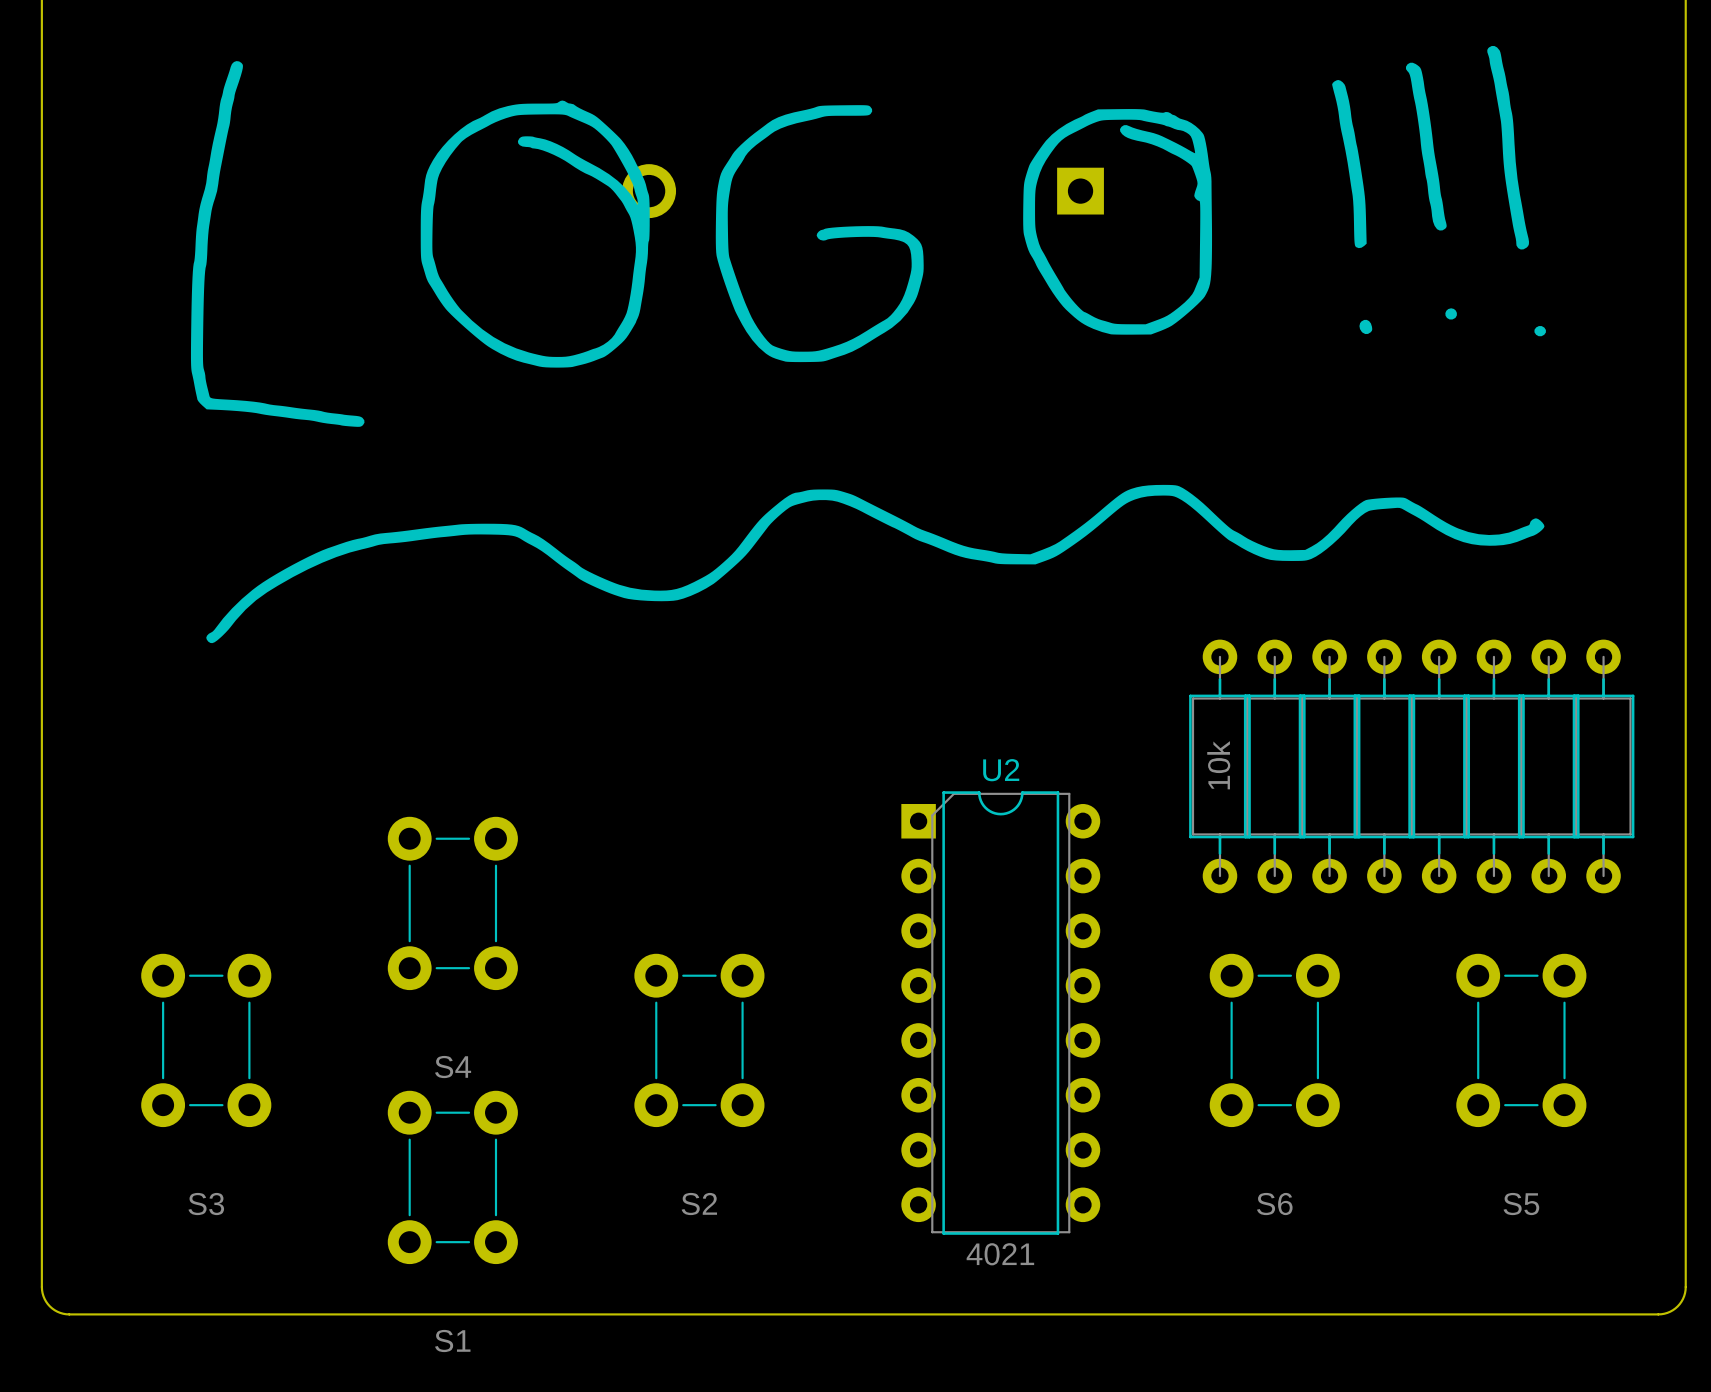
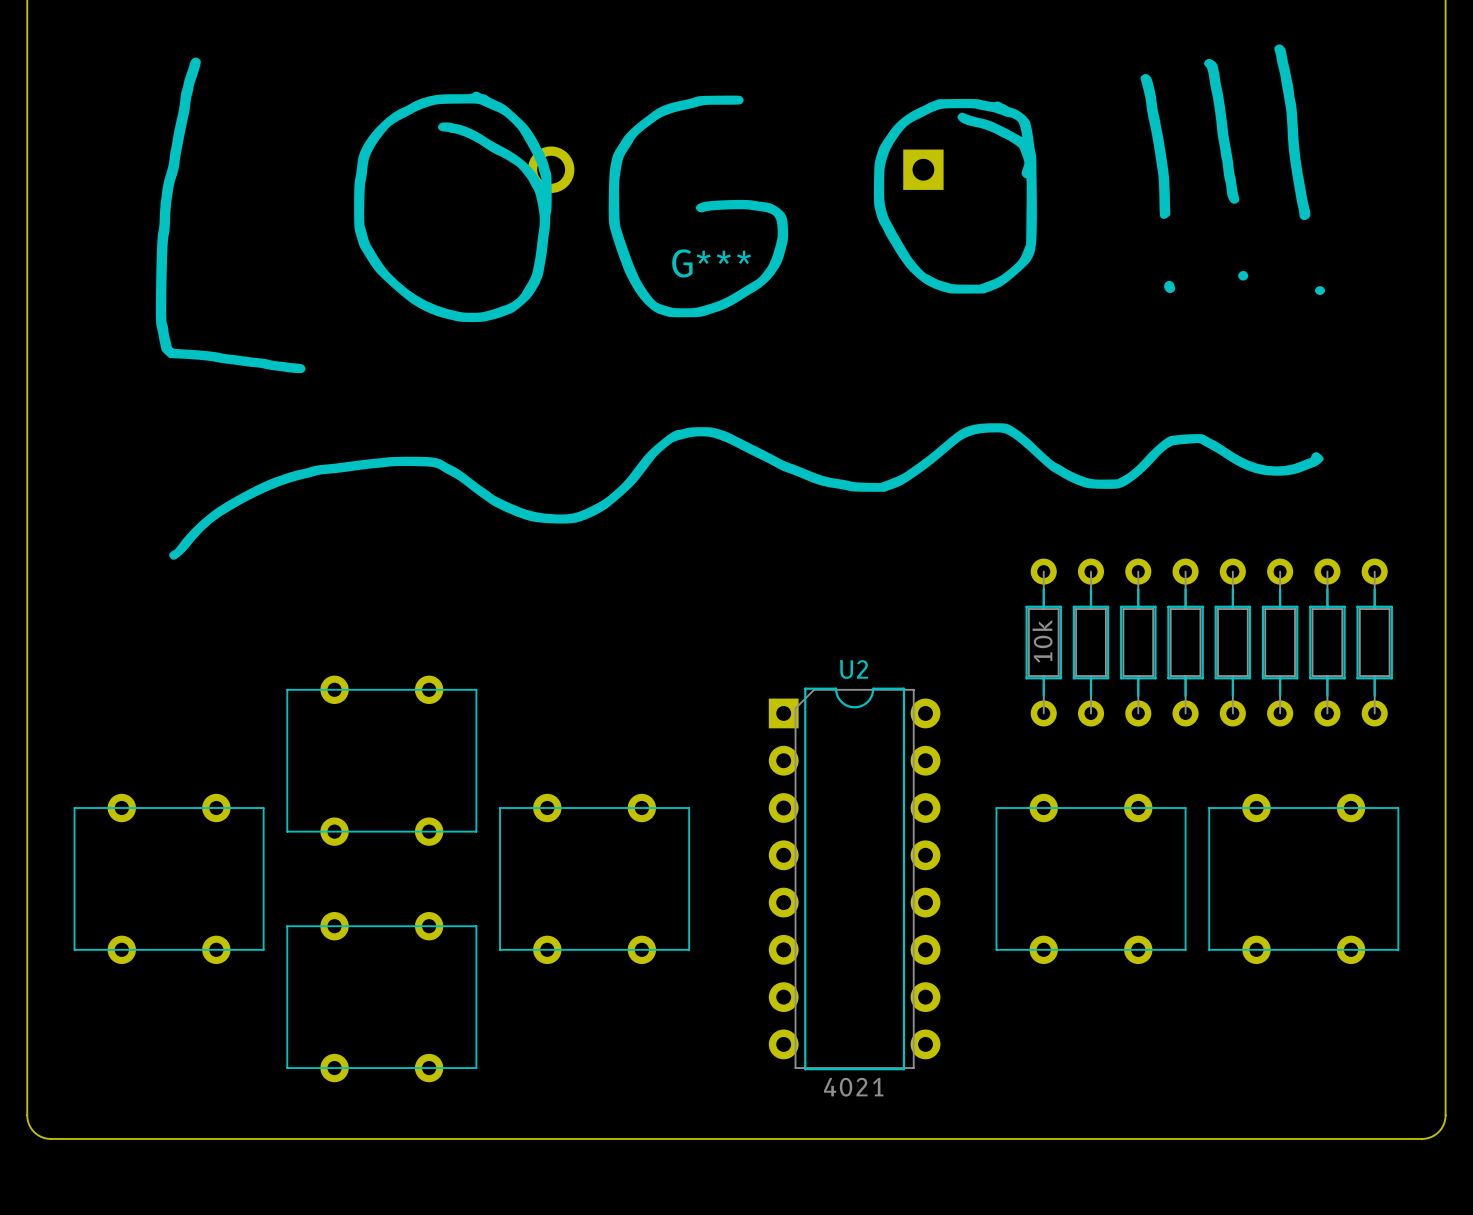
G***: none -> (740, 302)
part: none -> 10k (1043, 642)
part: none -> (1091, 642)
part: none -> (1138, 642)
part: none -> (1185, 642)
part: none -> (1232, 642)
part: none -> (1280, 642)
part: none -> (1327, 642)
part: none -> (1374, 642)
part: 10k (1219, 766) -> none
part: (1274, 766) -> none
part: (1329, 766) -> none
part: (1384, 766) -> none
part: (1439, 766) -> none
part: (1493, 766) -> none
part: (1548, 766) -> none
part: (1603, 766) -> none
part: none -> (381, 760)
S4: (452, 903) -> none
part: none -> (169, 878)
part: none -> (594, 878)
part: none -> (1091, 878)
part: none -> (1303, 878)
S3: (206, 1040) -> none
S2: (699, 1040) -> none
S6: (1274, 1040) -> none
S5: (1521, 1040) -> none
part: none -> (381, 997)
S1: (452, 1177) -> none

